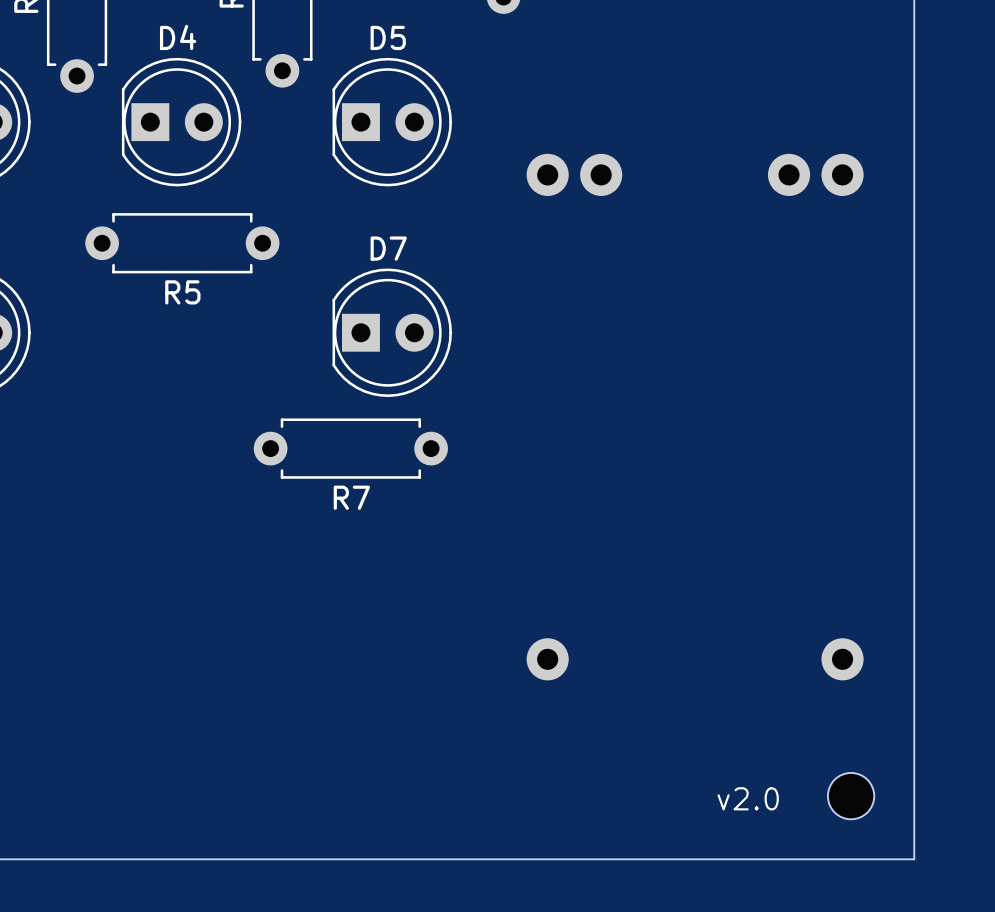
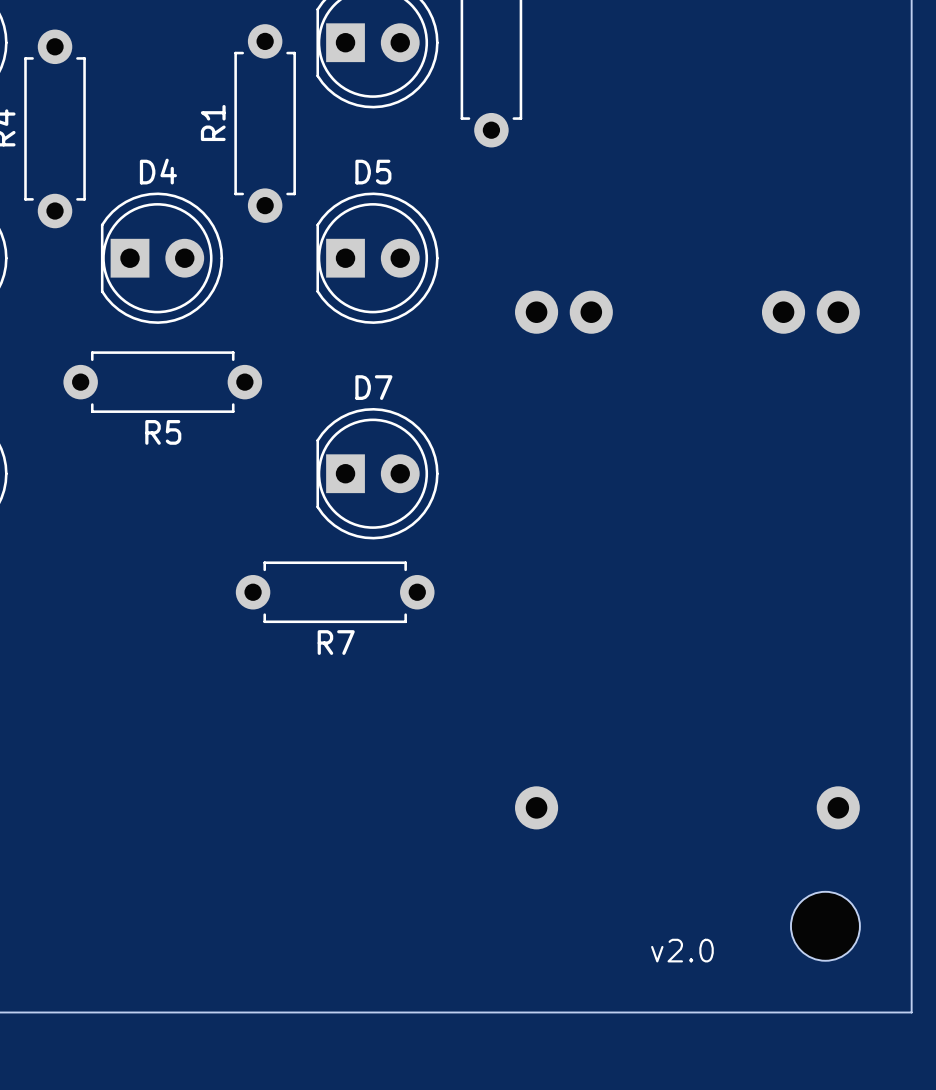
part: none -> (825, 926)
part: (851, 796) -> none
text position: v2.0 (748, 798) -> v2.0 (682, 950)

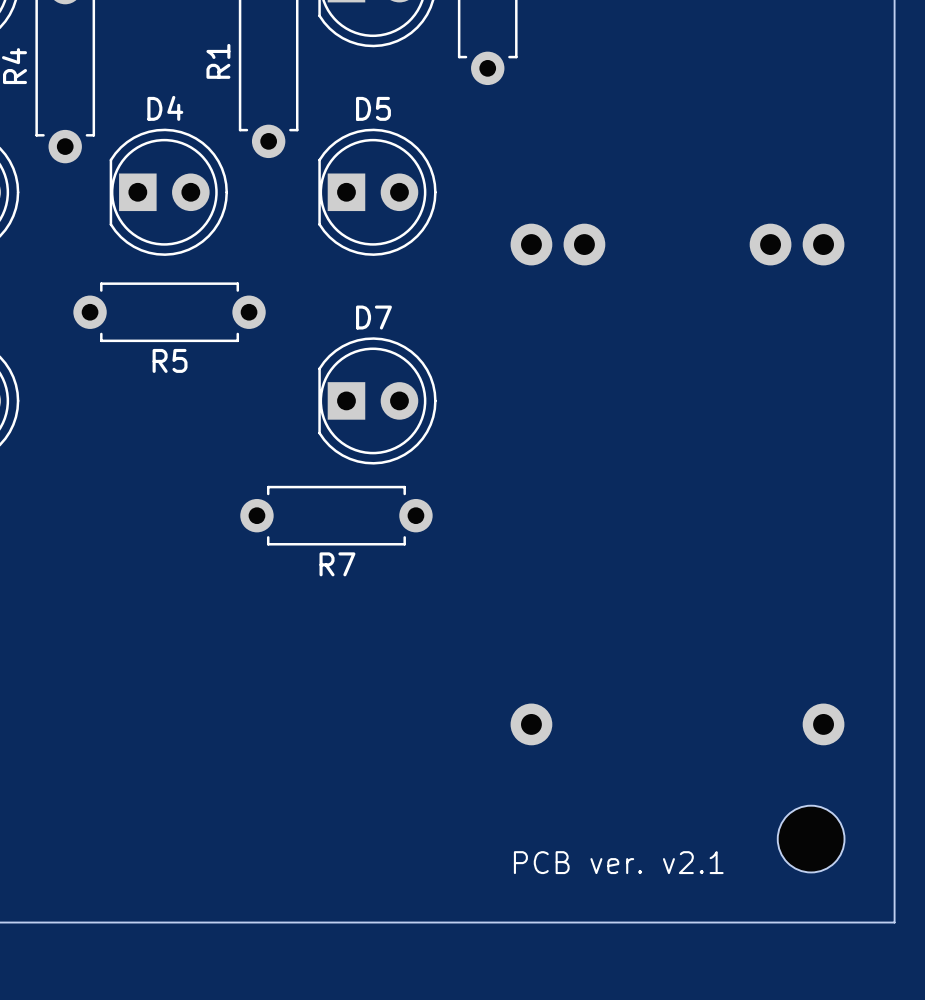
text: none -> PCB ver. v2.1 (618, 862)
text: v2.0 (682, 950) -> none

